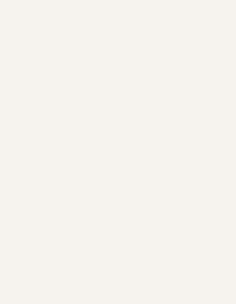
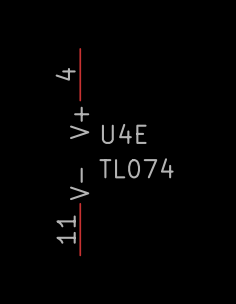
U4E: none -> TL074 (80, 152)

